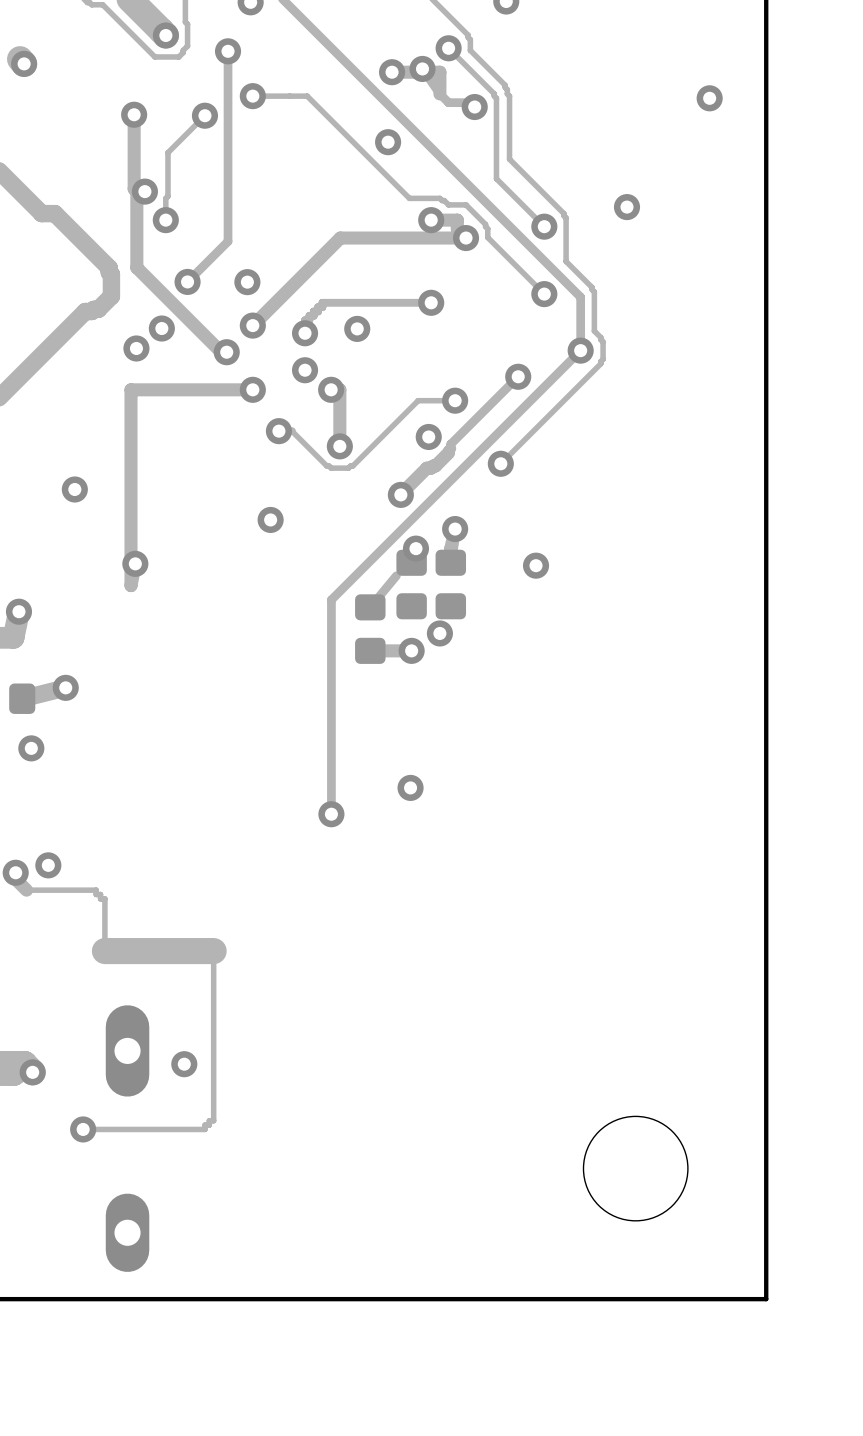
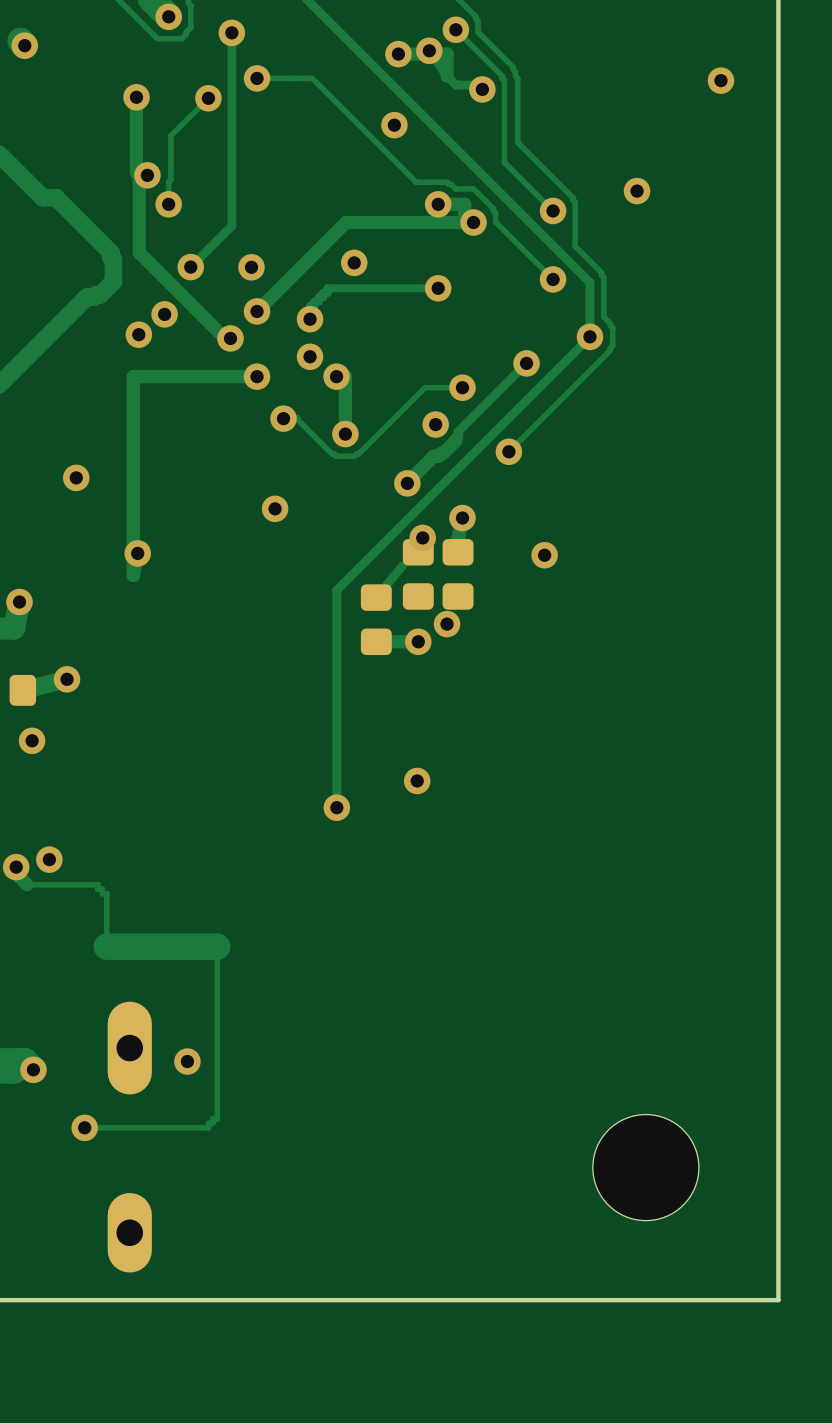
via position: (357, 328) -> (354, 262)

